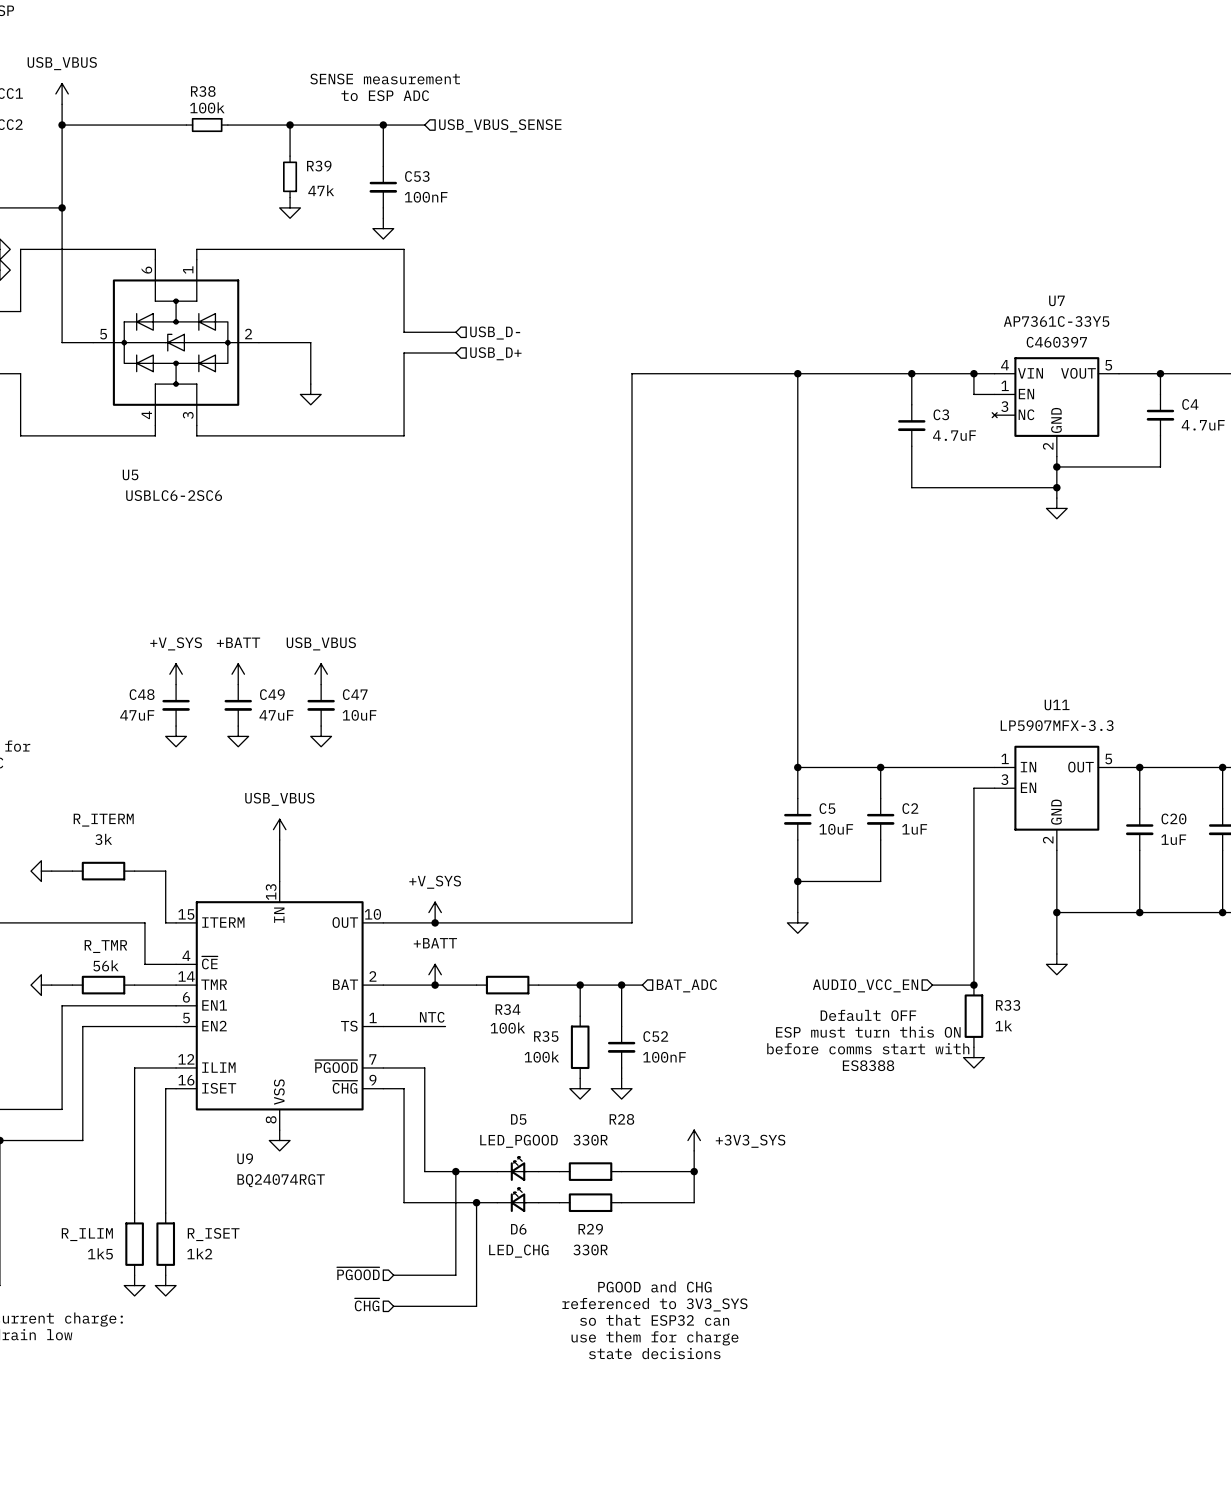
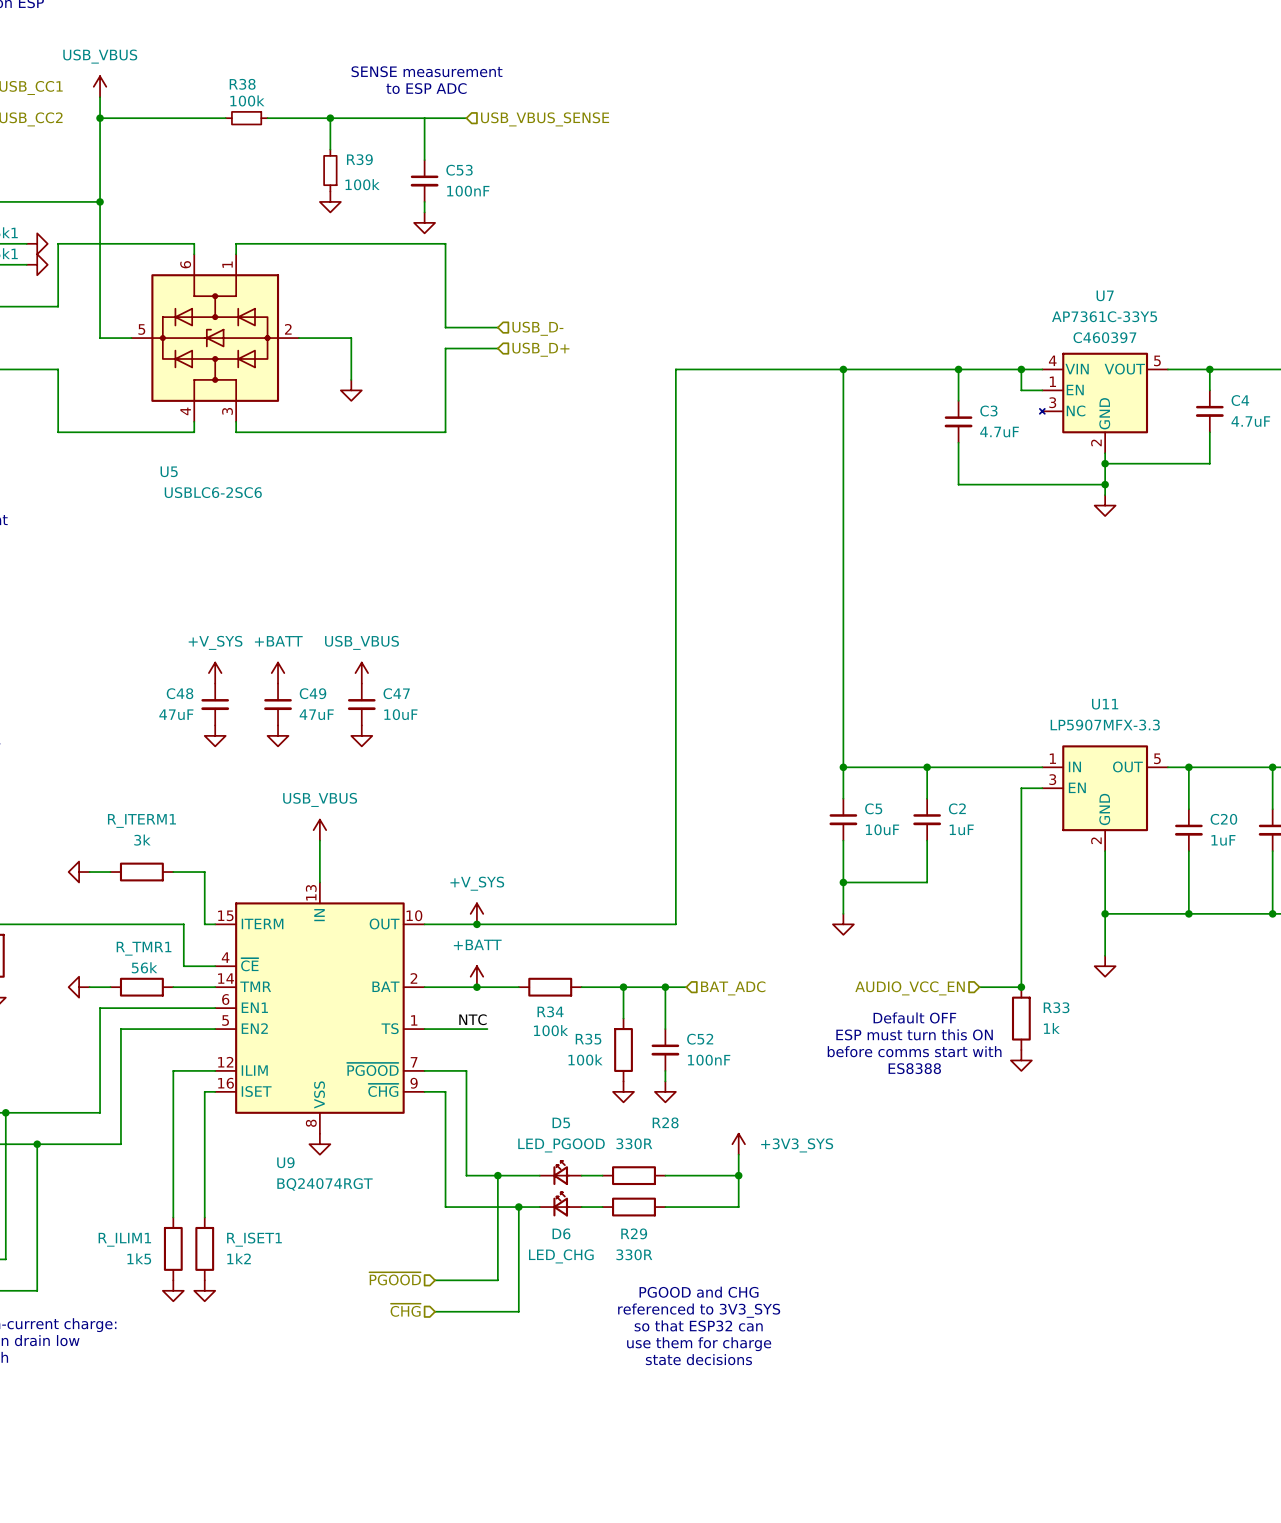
junction: (383, 125) -> none
R39 value: 47k (321, 190) -> 100k (362, 184)
R_ITERM name: R_ITERM (103, 820) -> R_ITERM1 (141, 820)
R_TMR name: R_TMR (105, 946) -> R_TMR1 (144, 948)
R_ILIM name: R_ILIM (87, 1234) -> R_ILIM1 (124, 1239)
R_ISET name: R_ISET (213, 1234) -> R_ISET1 (254, 1239)

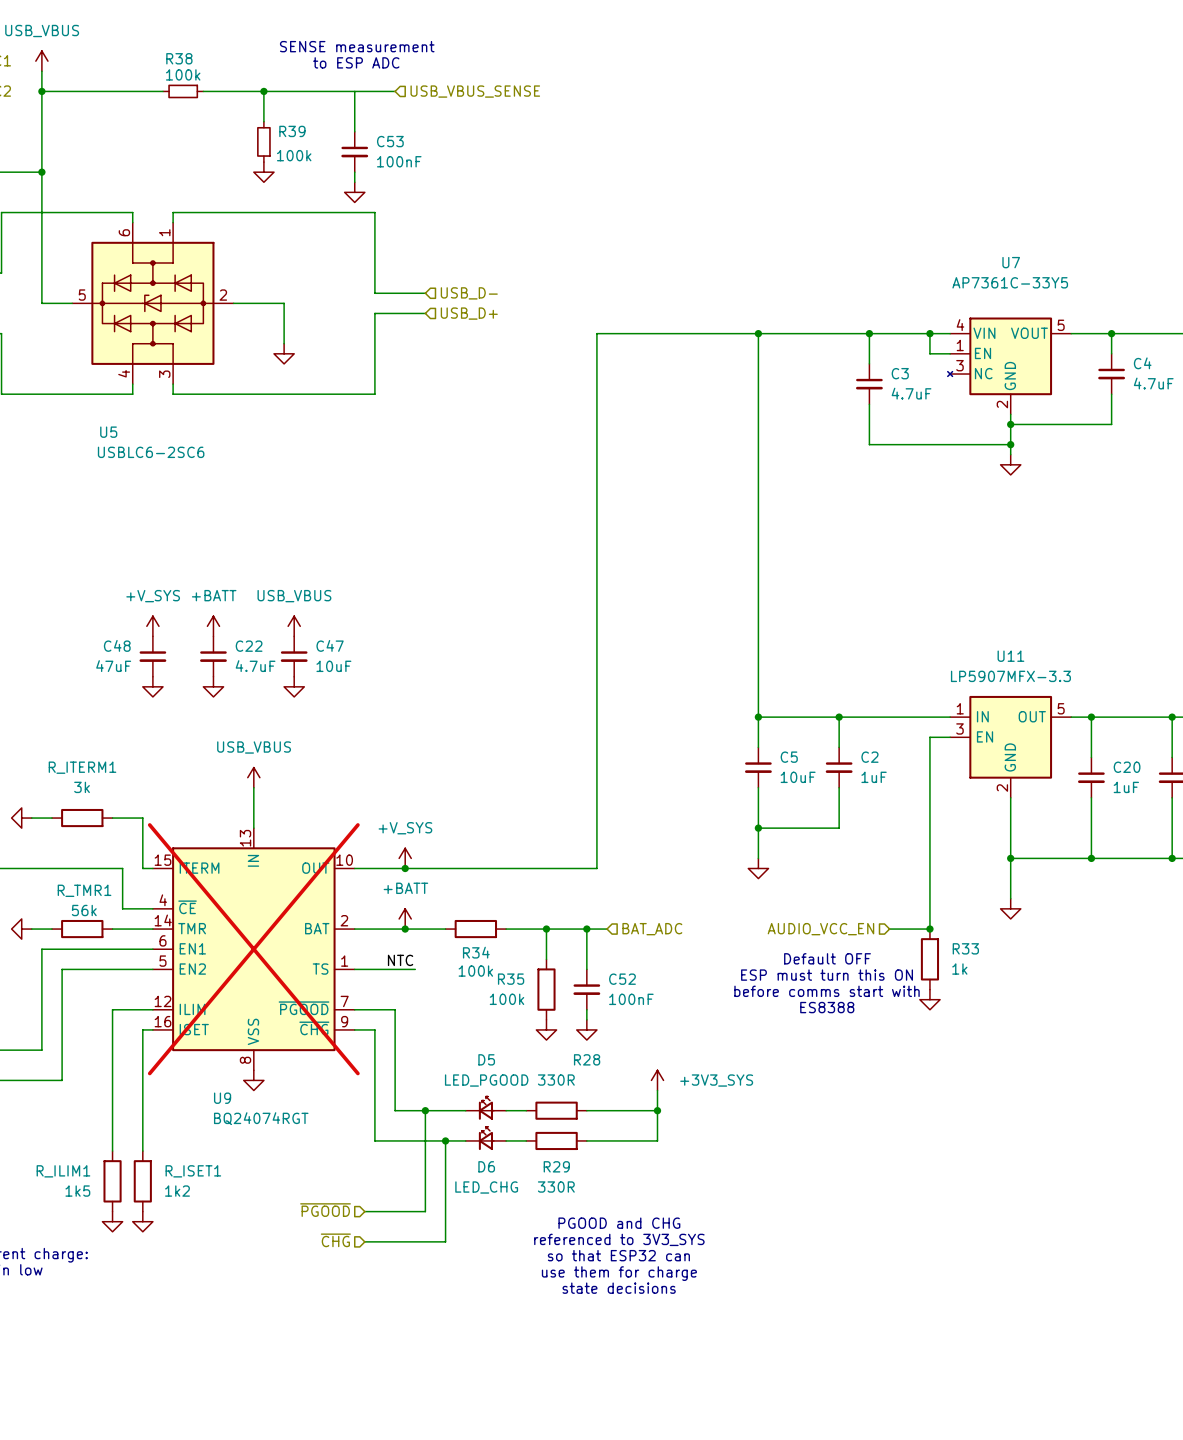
U7 text: C460397 (1104, 337) -> none
C49 name: C49 (313, 693) -> C22 (249, 646)
C49 value: 47uF (316, 714) -> 4.7uF (255, 666)
U9 do-not-place cross: none -> (253, 949)

